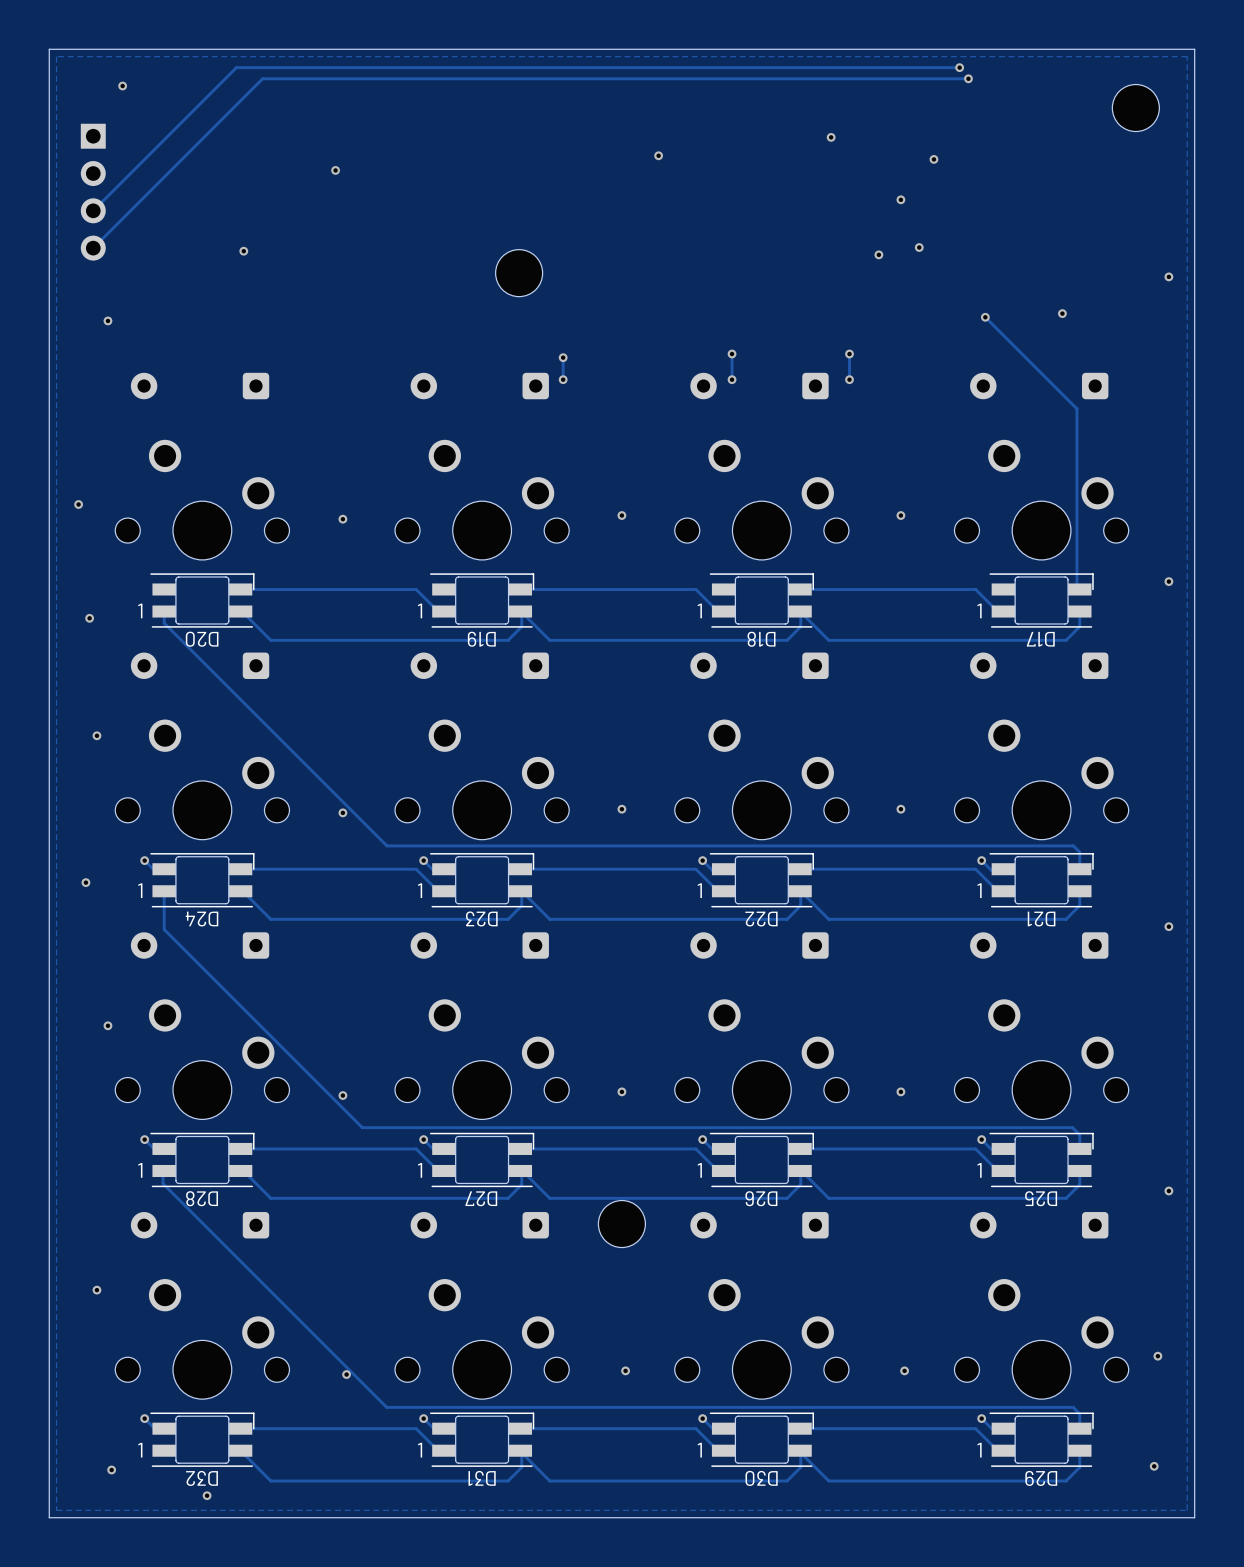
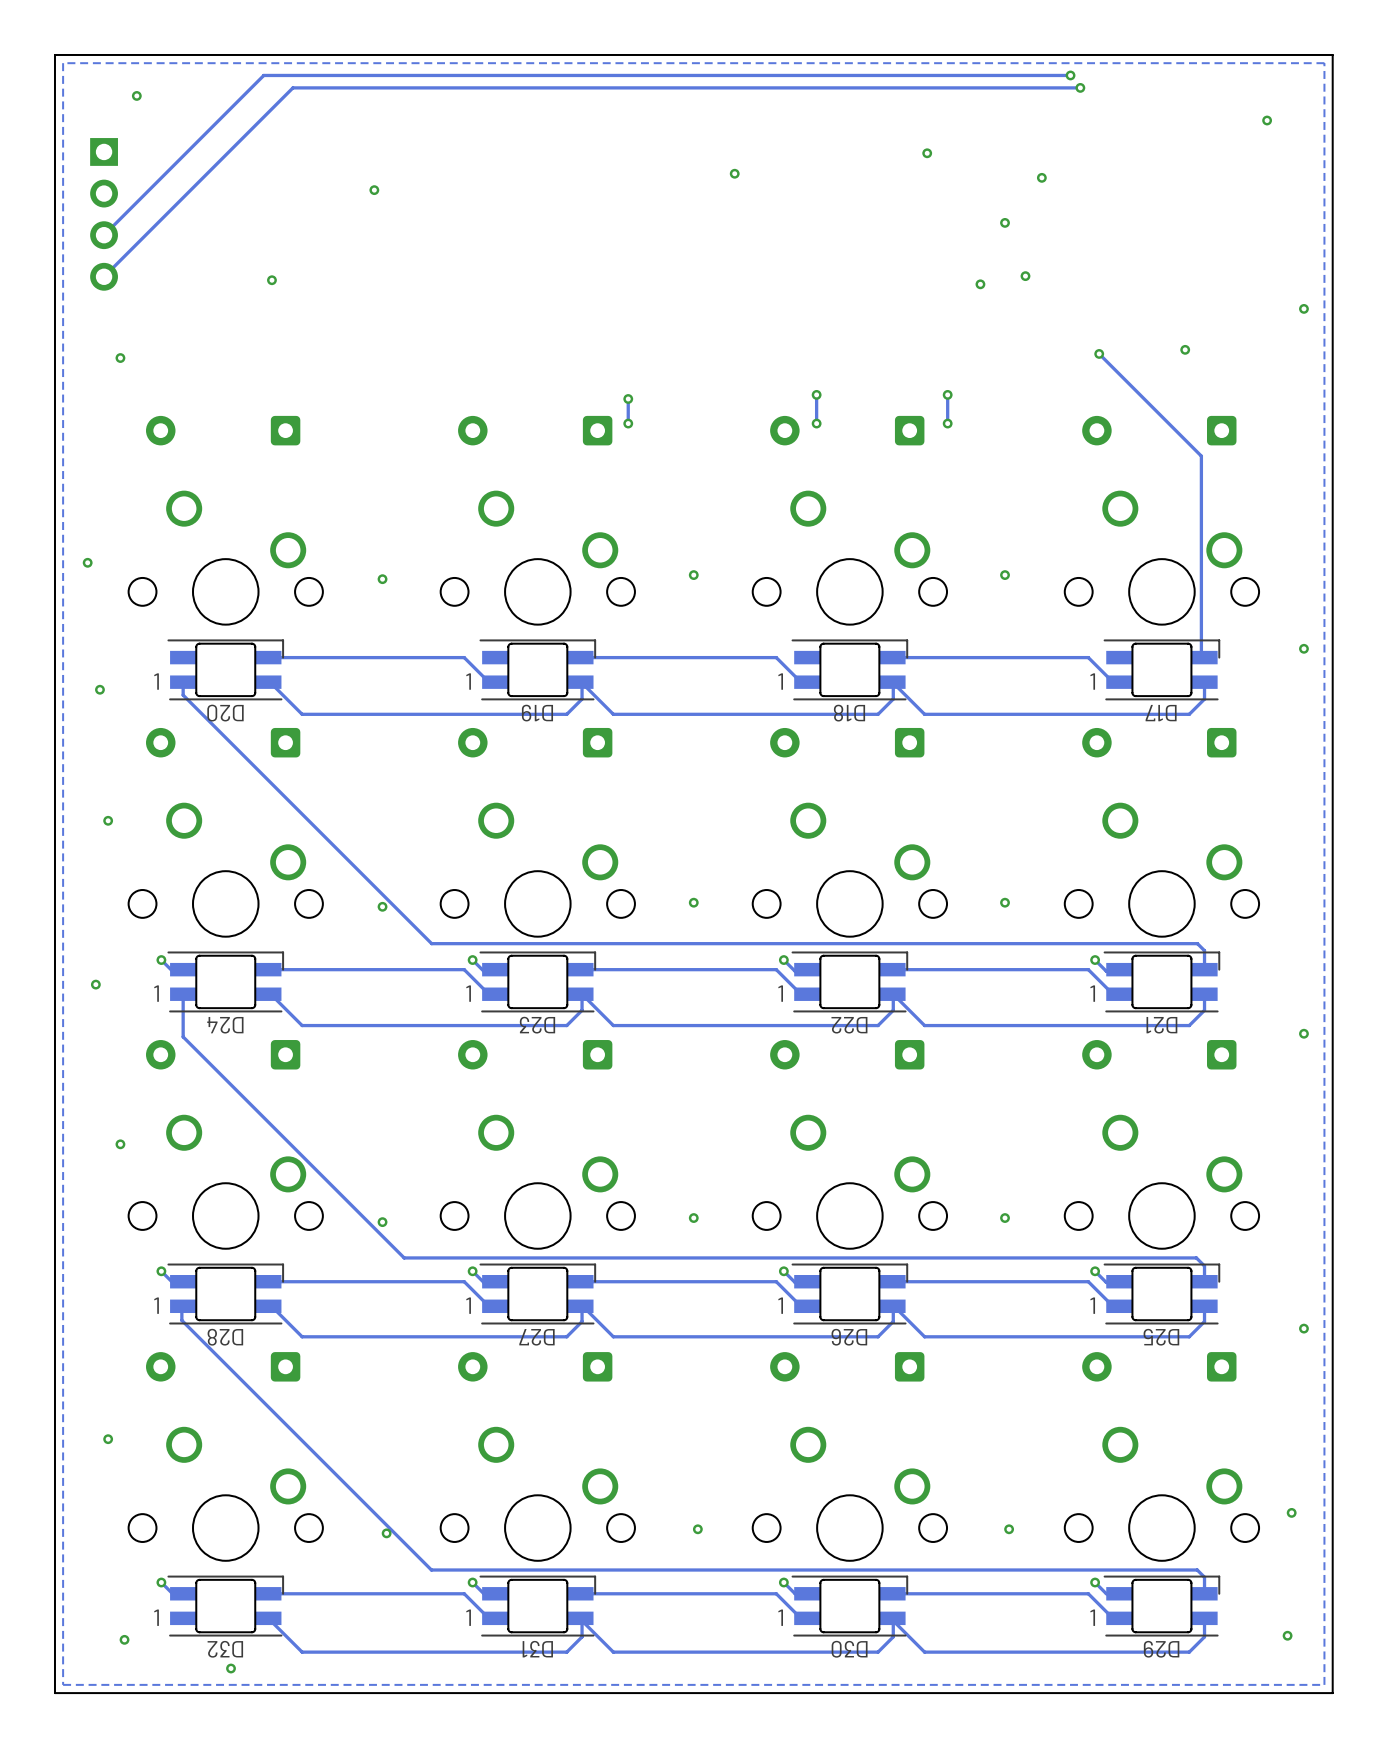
part: (1135, 108) -> none
via: none -> (1267, 120)
part: (519, 273) -> none
part: (621, 1224) -> none

